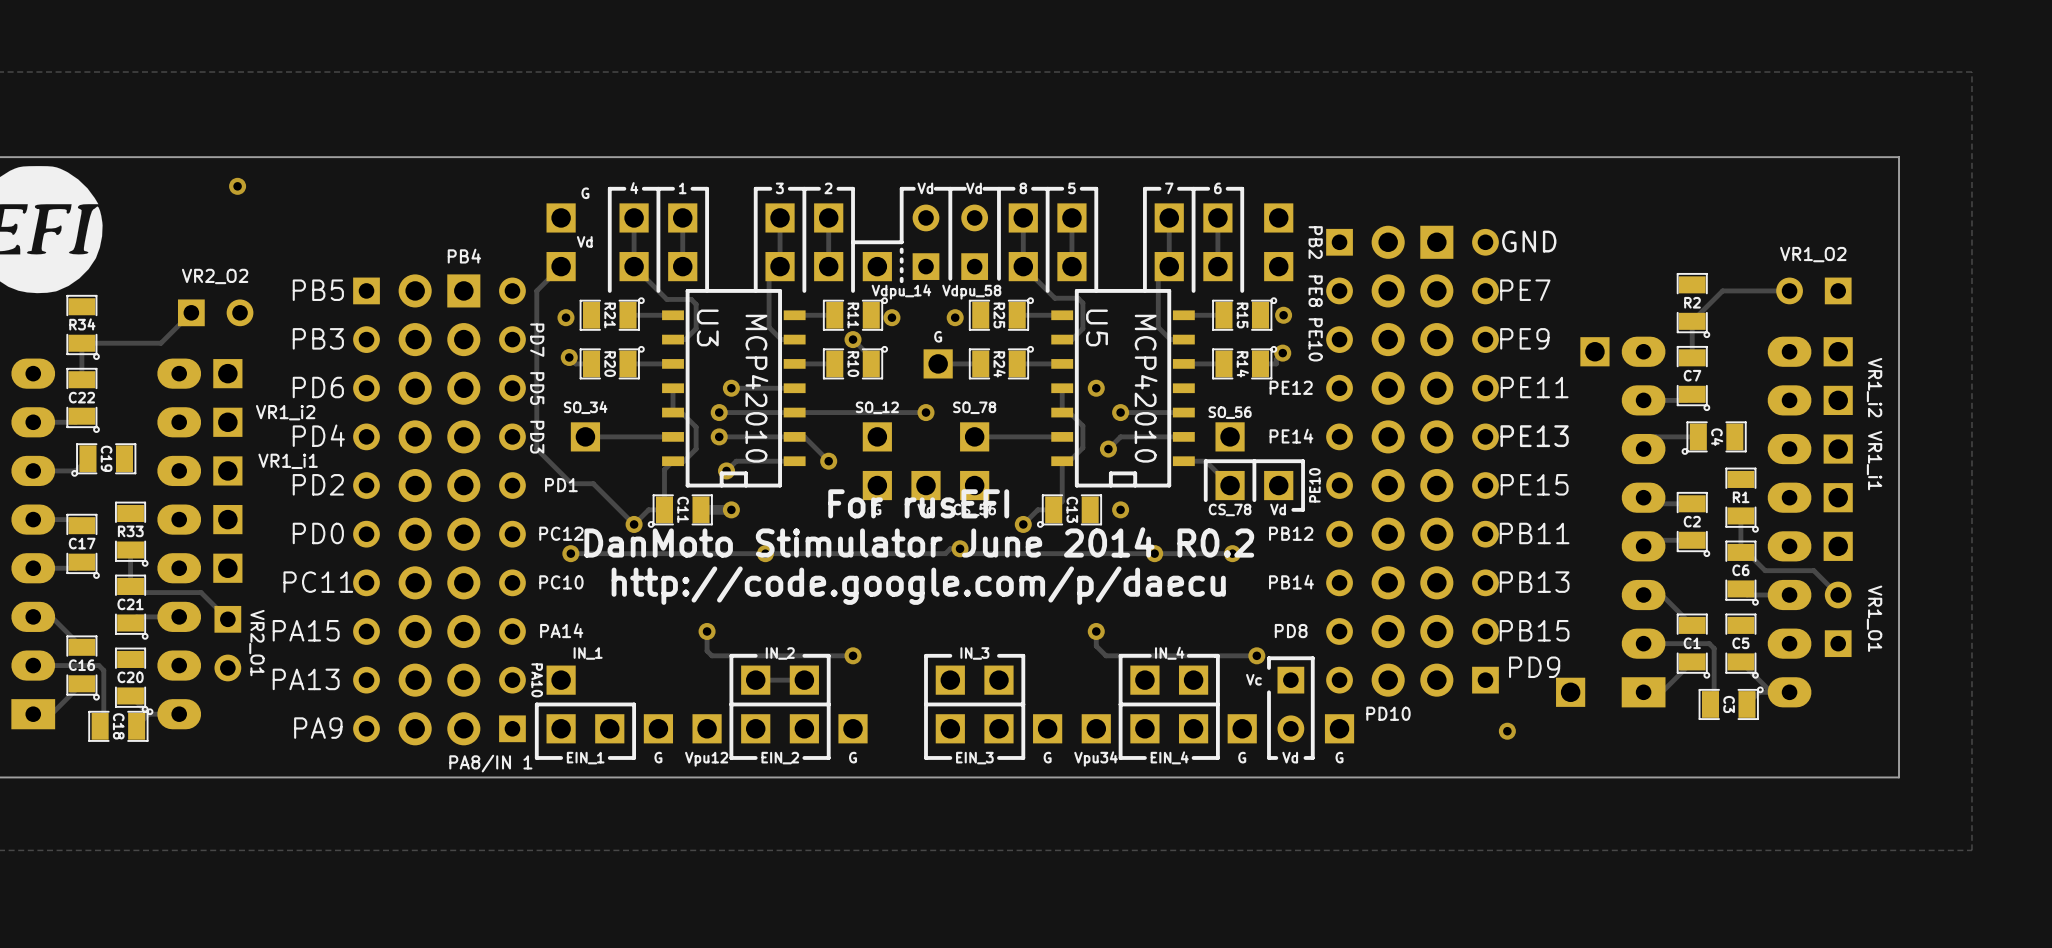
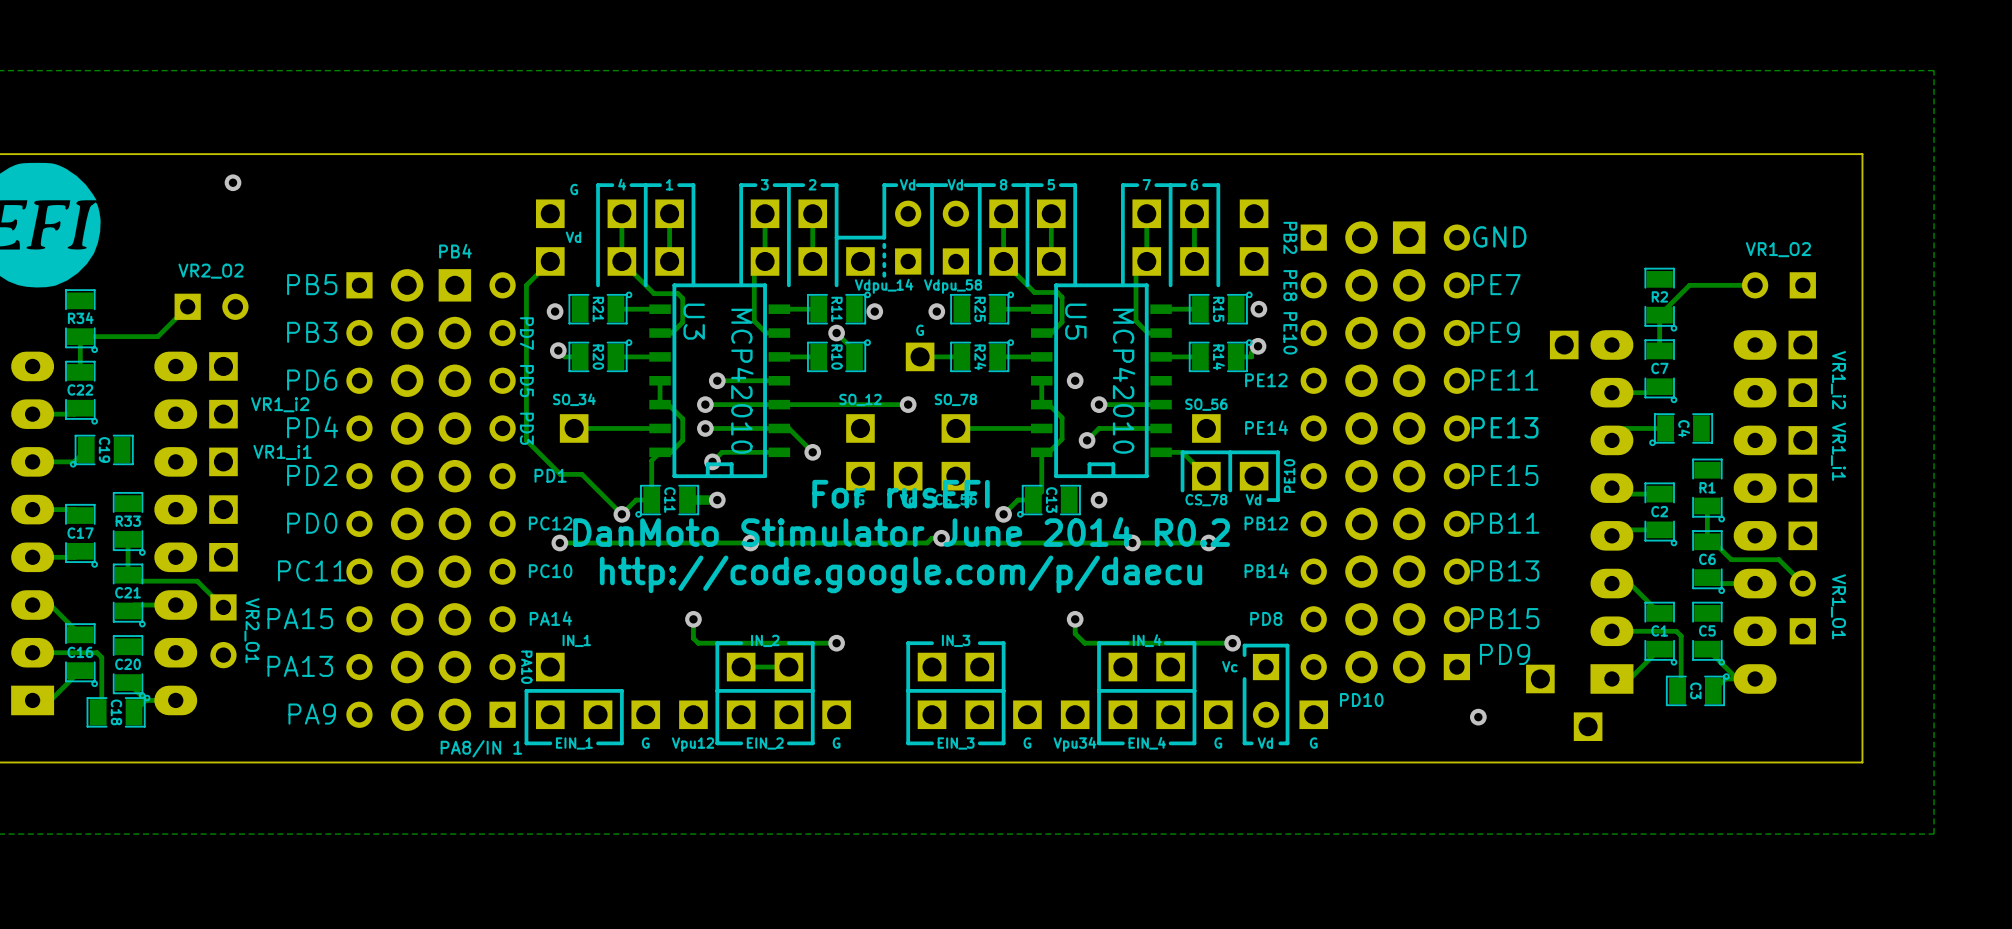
part: none -> (1588, 726)

